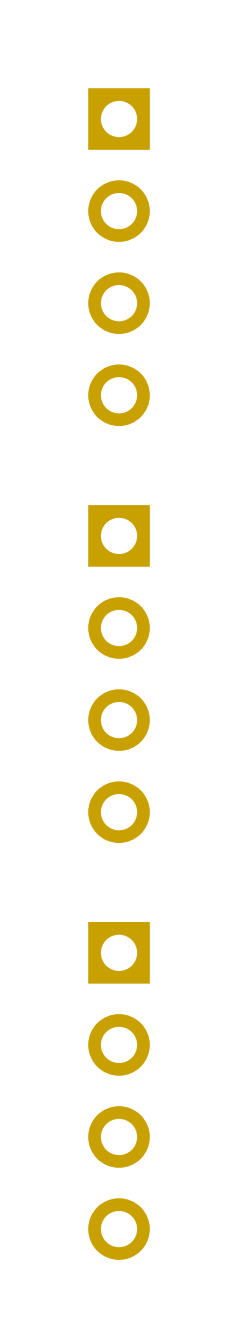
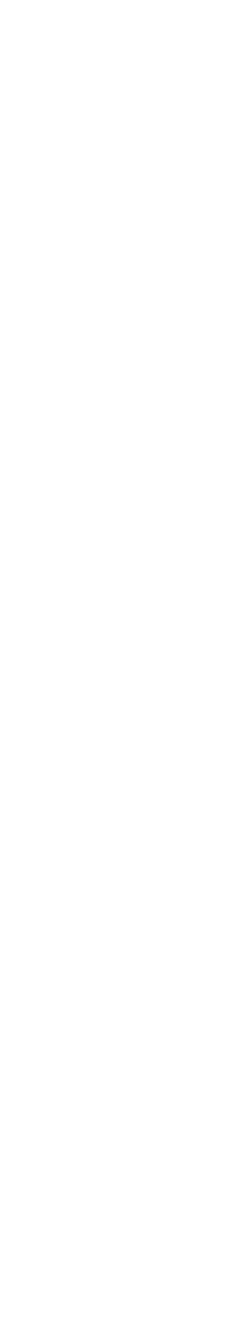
part: (119, 257) -> none
part: (119, 674) -> none
part: (119, 1090) -> none

